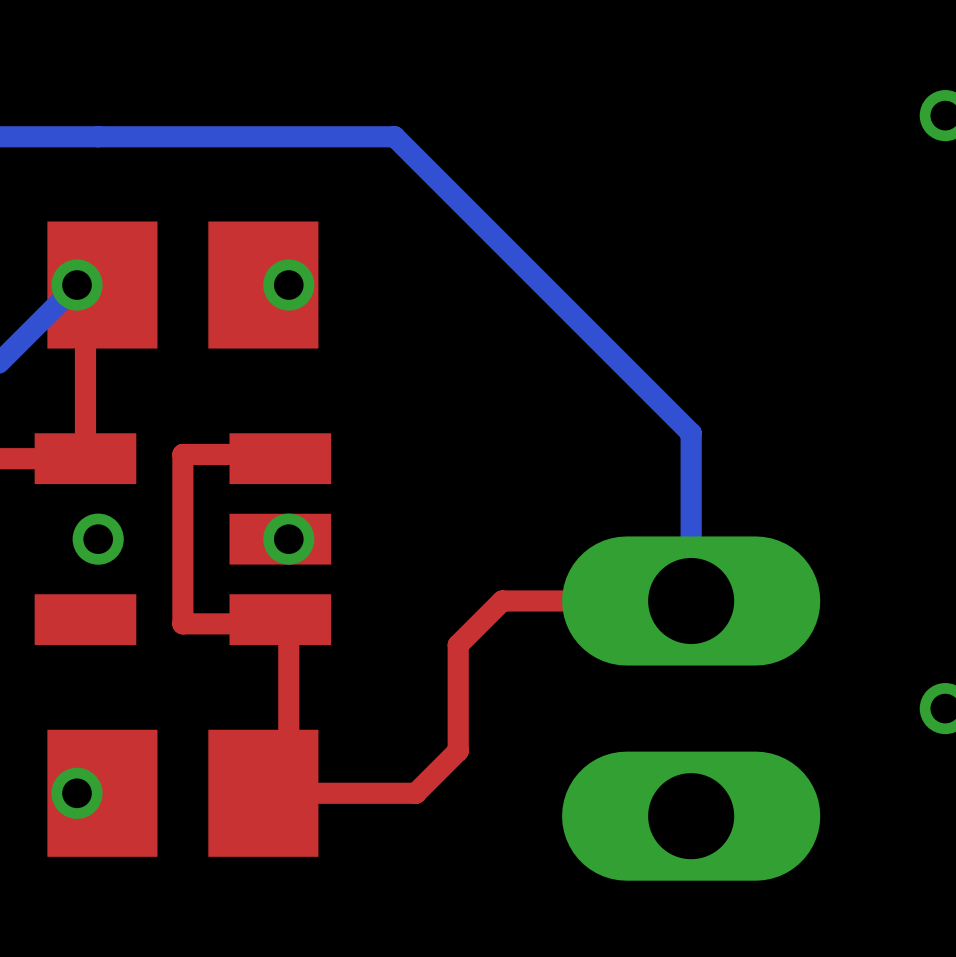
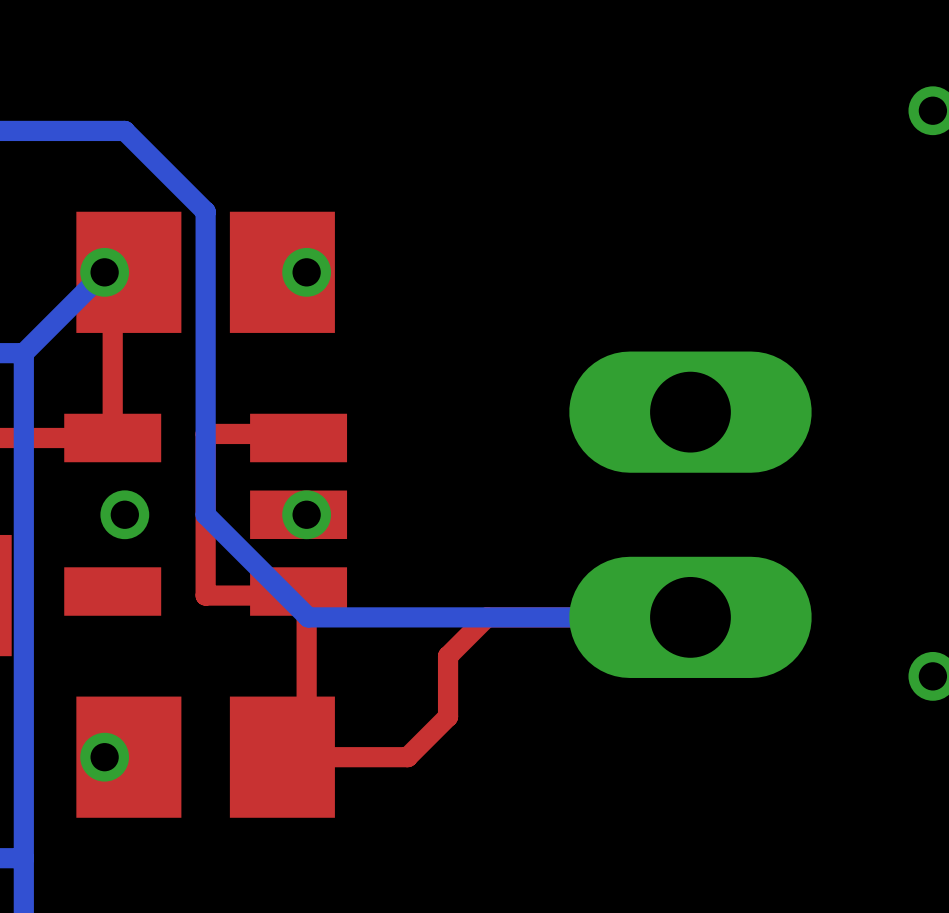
bottom track: (98, 136) (394, 136) (691, 433) (691, 600) -> (124, 130) (205, 211) (205, 514) (308, 617) (690, 617)
part: none -> (690, 514)
top track: (691, 600) (502, 600) (458, 645) (458, 750) (415, 793) (394, 793) -> (690, 617) (486, 617) (448, 656) (448, 716) (407, 757)
part: (691, 708) -> none

